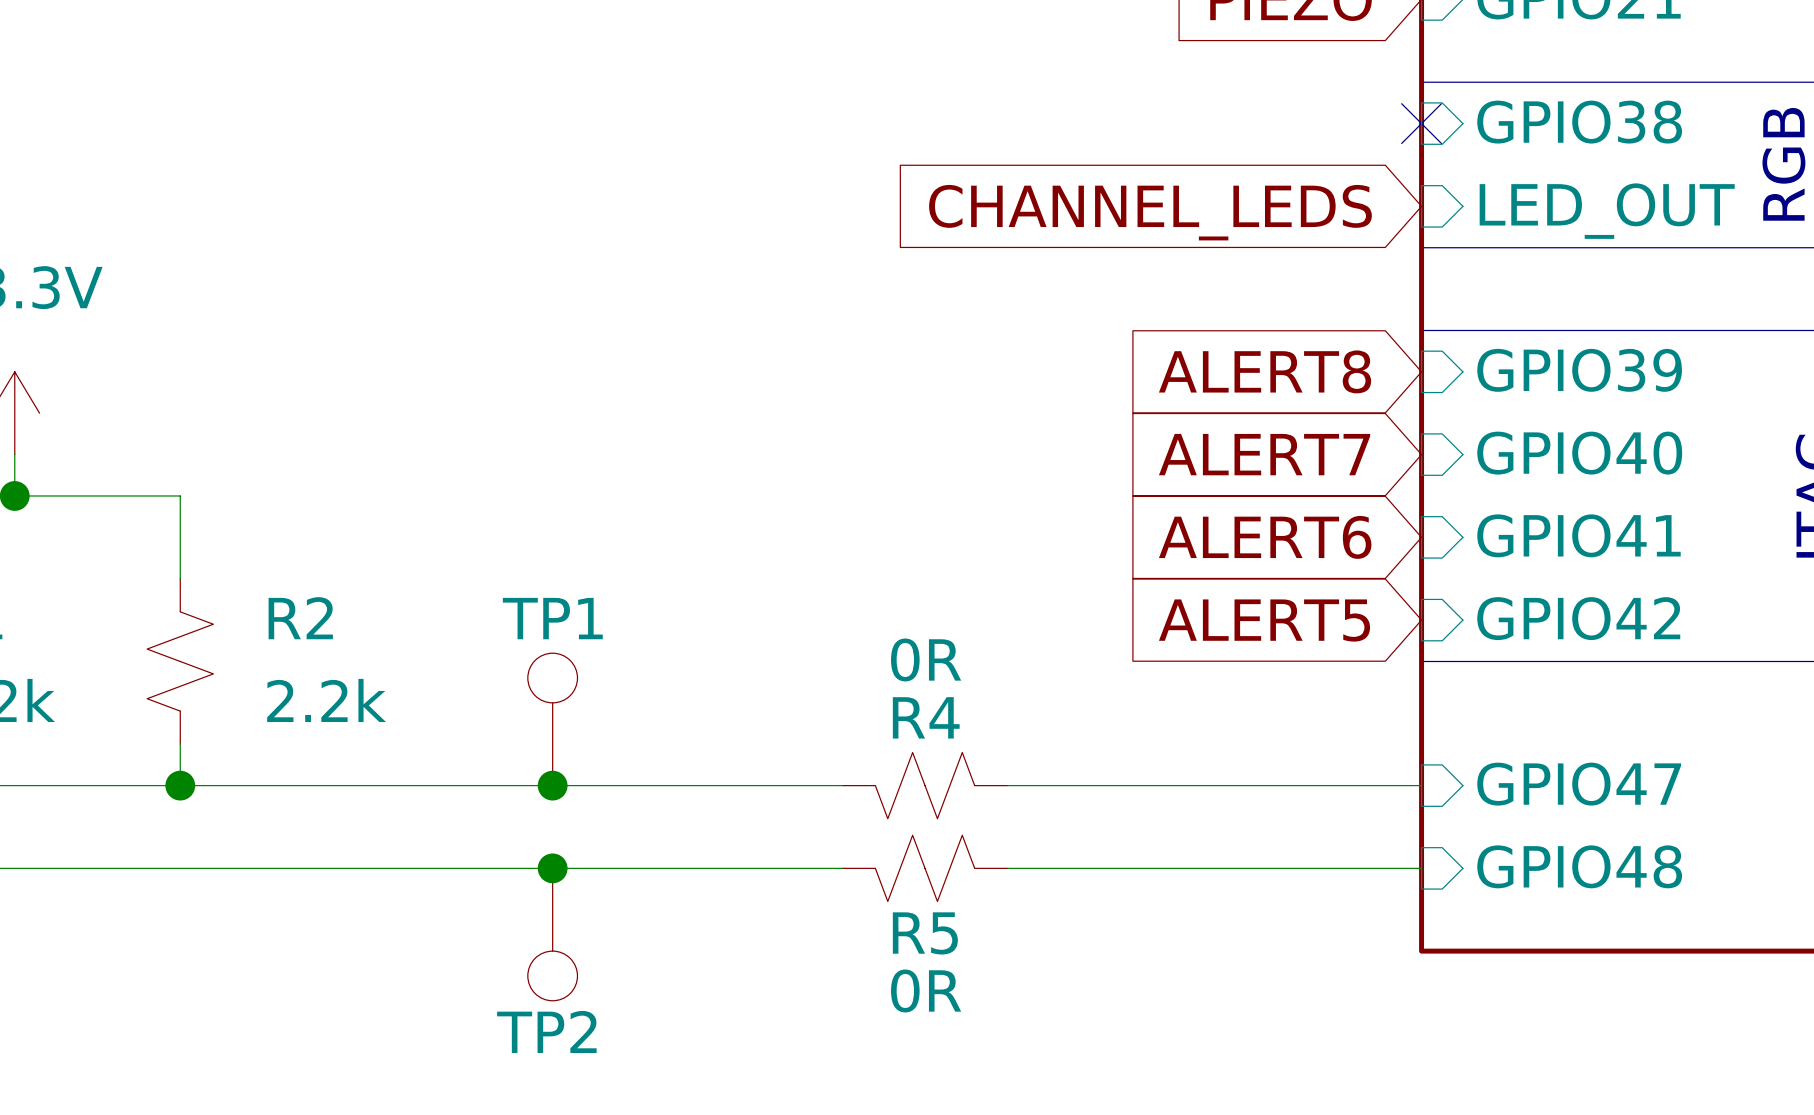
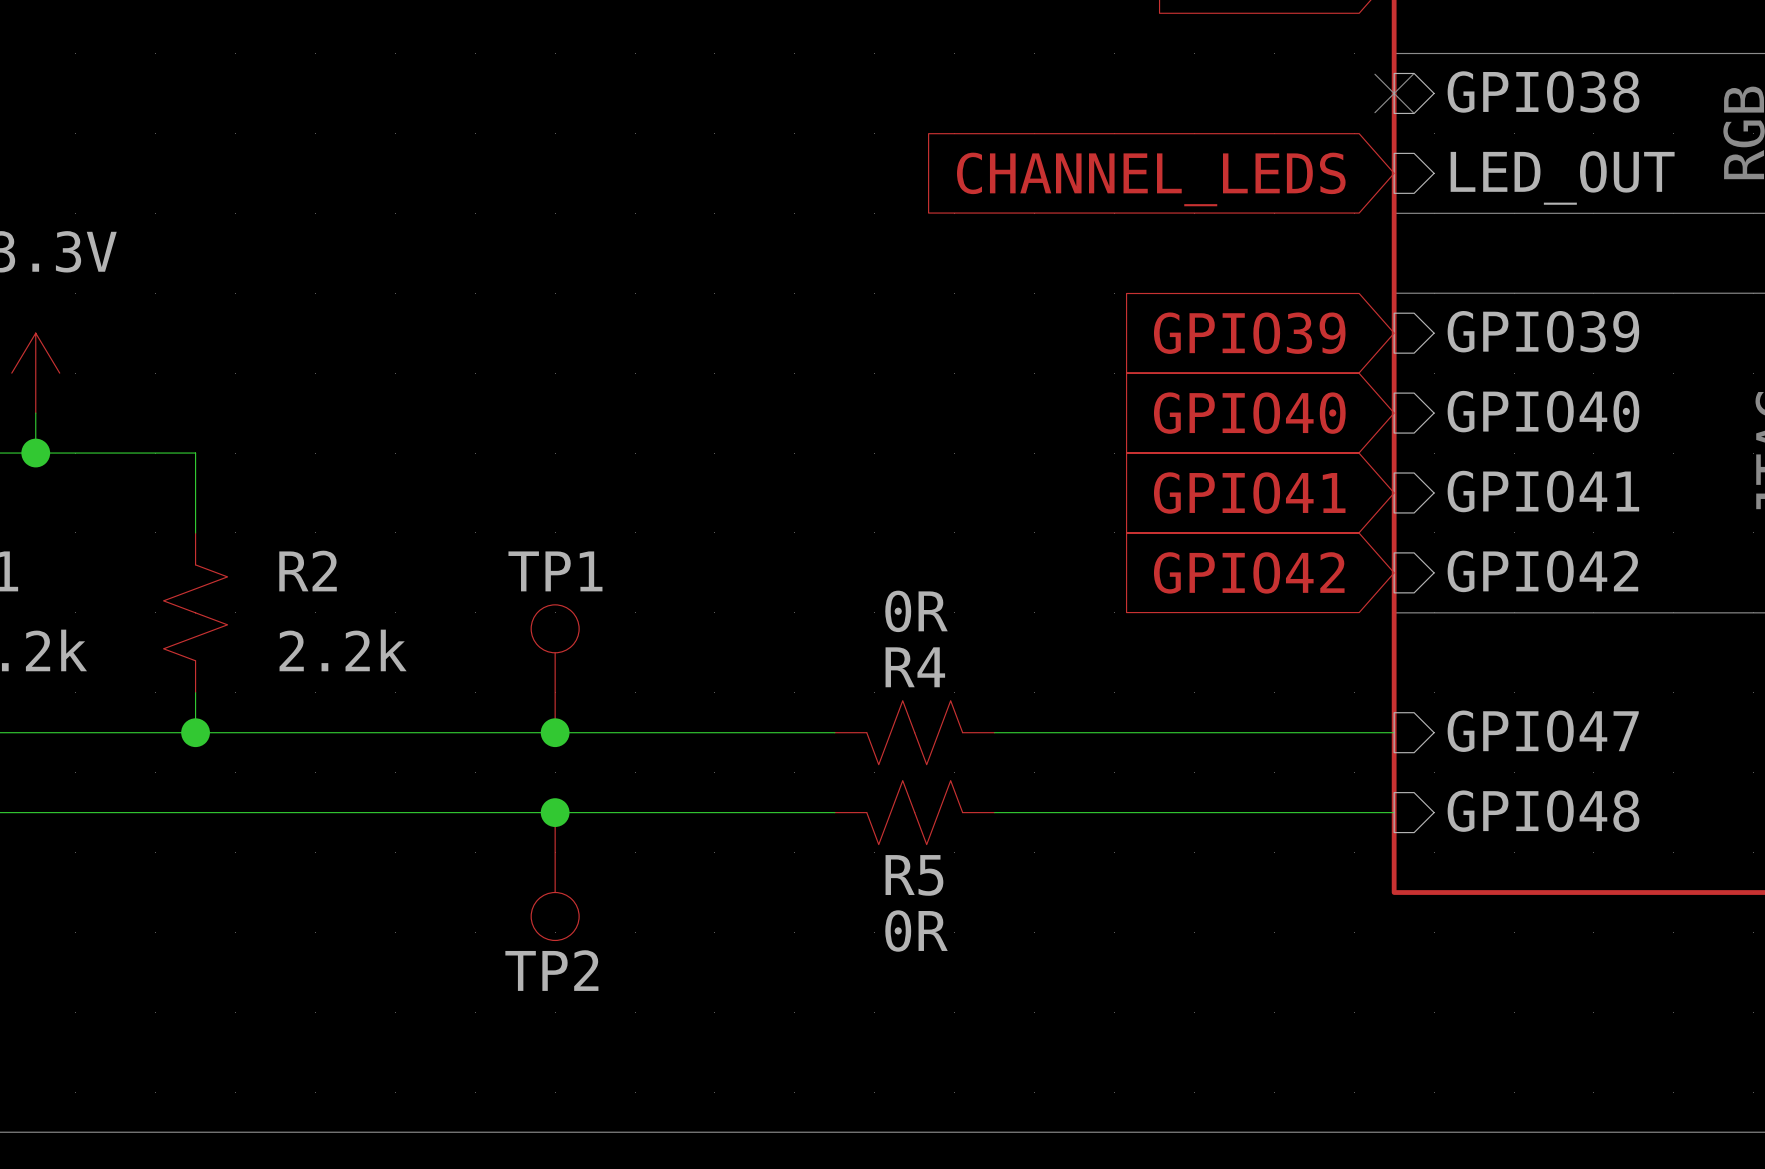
global label: ALERT8 (1265, 371) -> GPIO39 (1249, 333)
global label: ALERT7 (1264, 454) -> GPIO40 (1249, 413)
global label: ALERT6 (1265, 537) -> GPIO41 (1249, 493)
global label: ALERT5 (1264, 620) -> GPIO42 (1249, 572)

